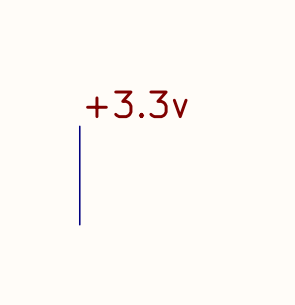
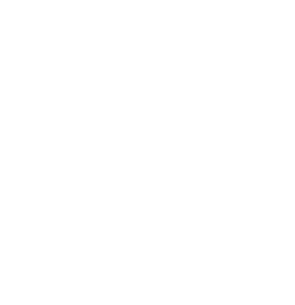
label: +3.3v (136, 104) -> none
wire: (79, 126) (79, 224) -> none

